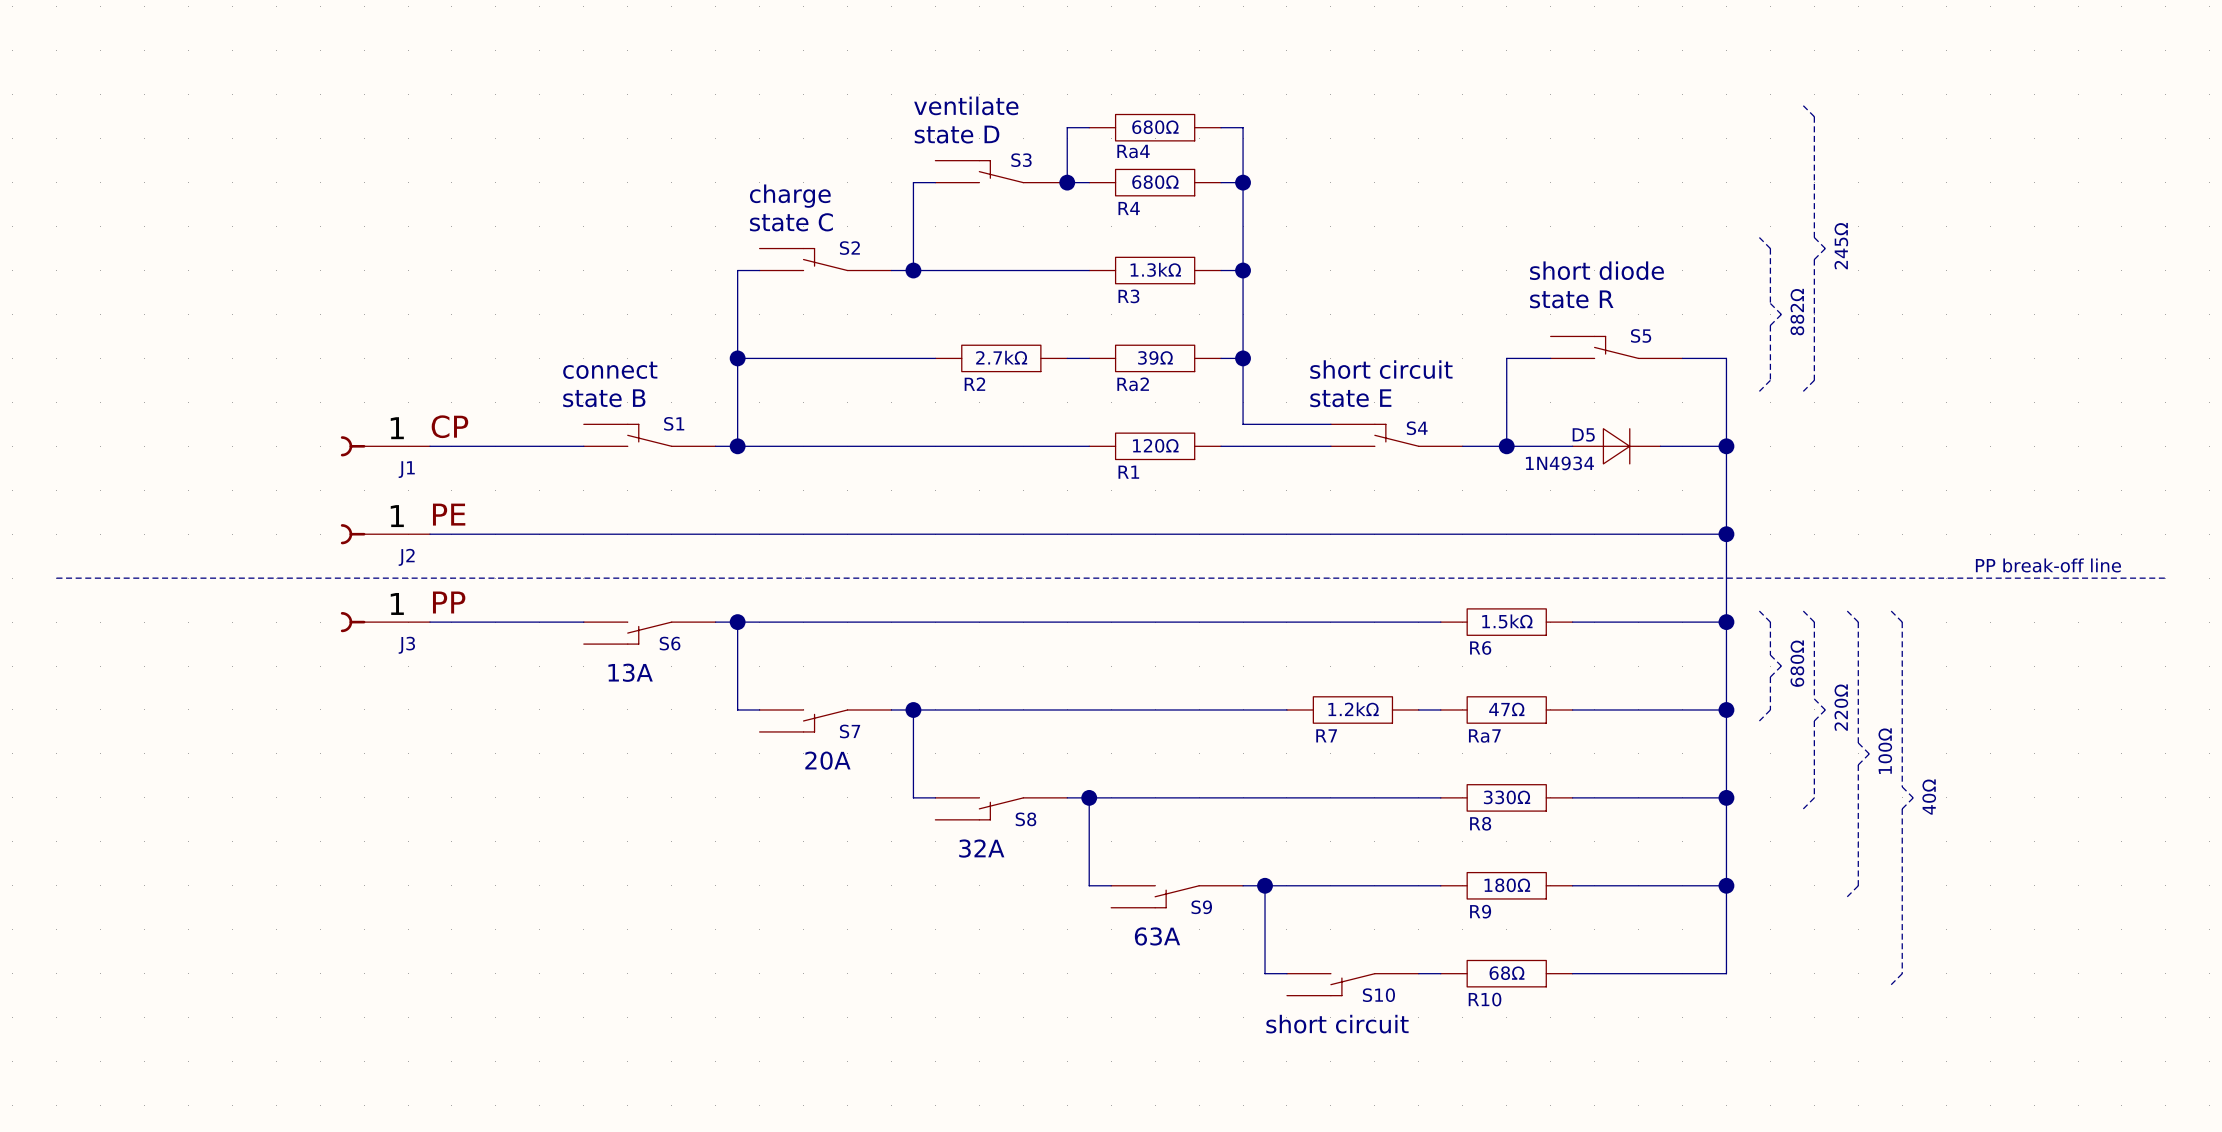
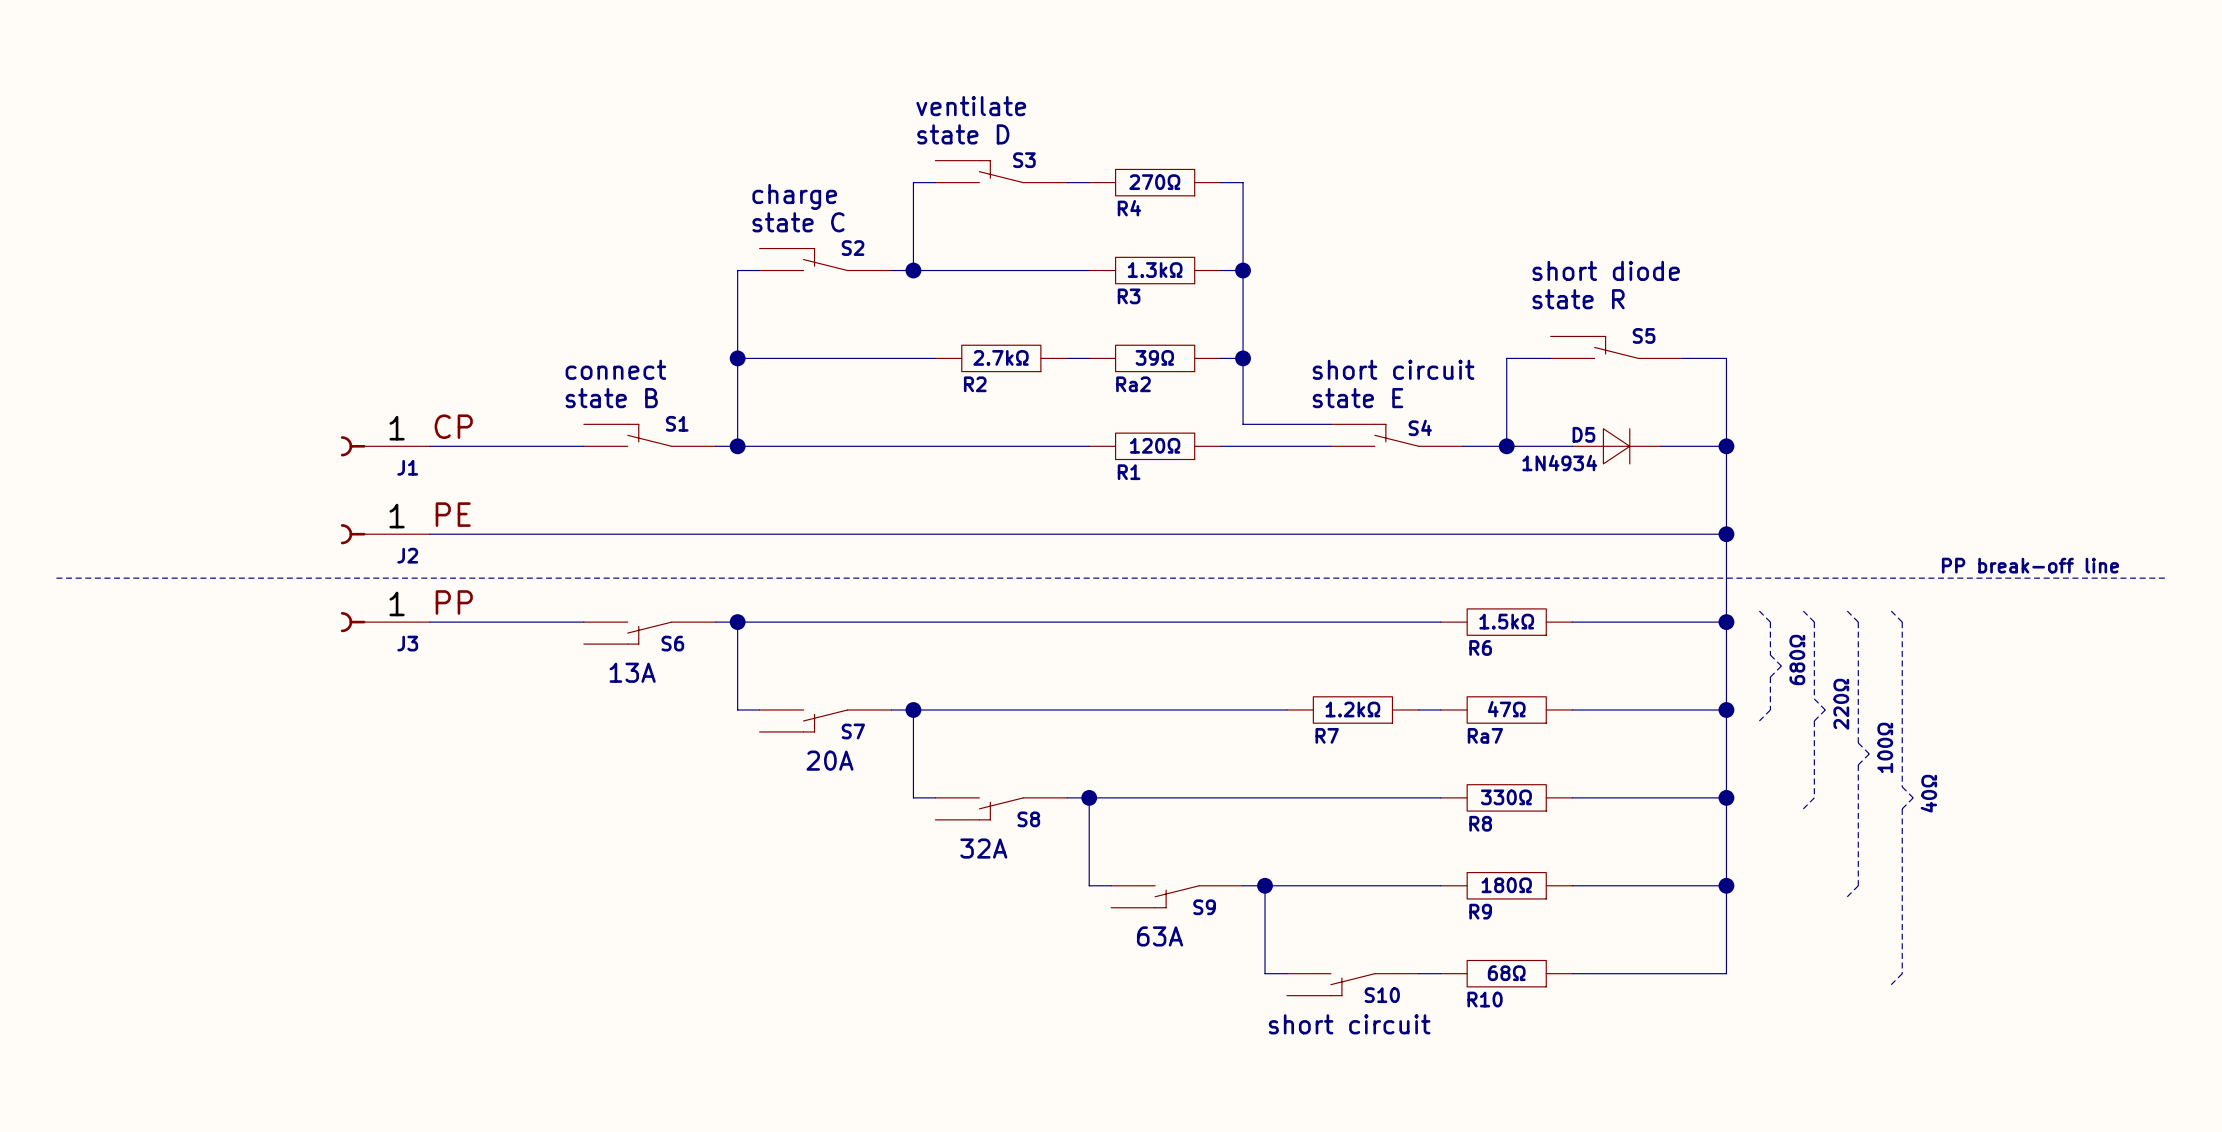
line: (1803, 105) (1814, 116) (1814, 237) (1825, 248) (1814, 259) (1814, 380) (1803, 391) -> none
wire: (1089, 127) (1067, 127) (1067, 182) -> none
Ra4: 680Ω (1155, 127) -> none
wire: (1221, 127) (1243, 127) (1243, 182) -> none
junction: (1067, 182) -> none
R4 value: 680Ω (1155, 182) -> 270Ω (1154, 182)
junction: (1243, 182) -> none
line: (1759, 237) (1770, 248) (1770, 303) (1781, 314) (1770, 325) (1770, 380) (1759, 391) -> none
text: 245Ω (1841, 246) -> none
text: 882Ω (1797, 312) -> none

